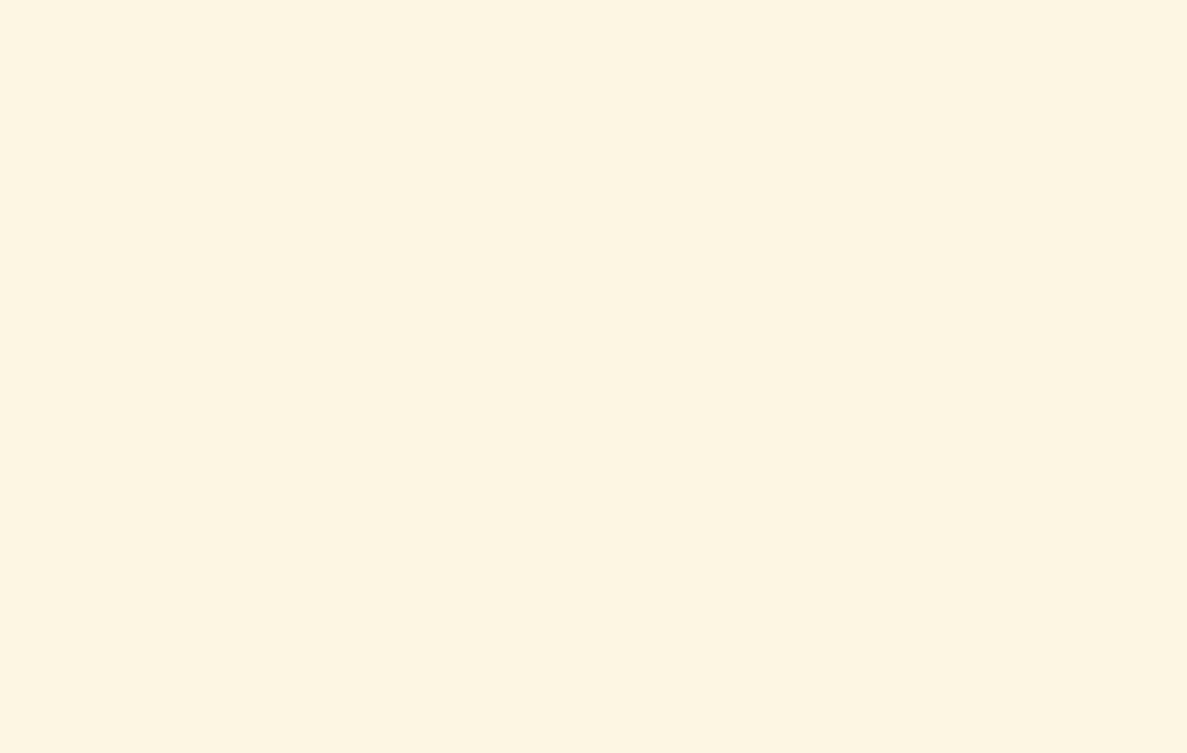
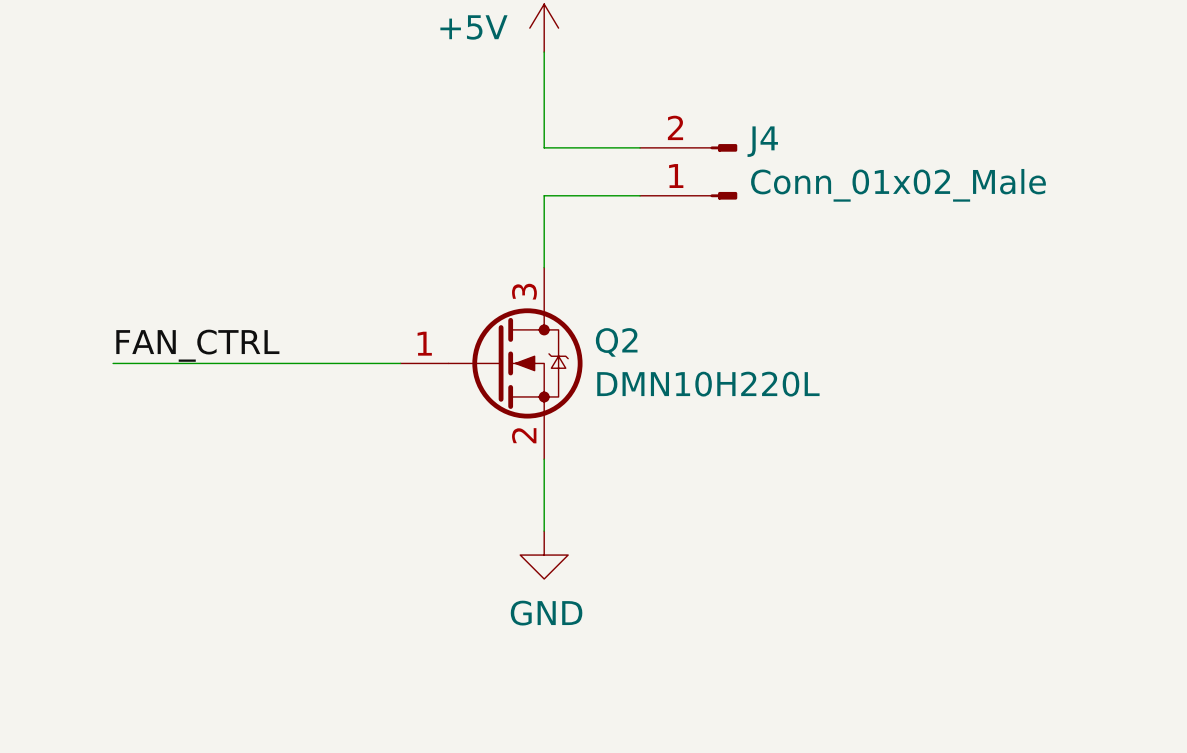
power symbol: none -> +5V (544, 28)
wire: none -> (544, 52) (544, 147) (640, 147)
J4: none -> Conn_01x02_Male (688, 171)
wire: none -> (640, 195) (544, 195) (544, 267)
label: none -> FAN_CTRL (197, 345)
wire: none -> (113, 363) (400, 363)
Q2: none -> DMN10H220L (491, 363)
wire: none -> (544, 459) (544, 531)
power symbol: none -> GND (544, 555)

